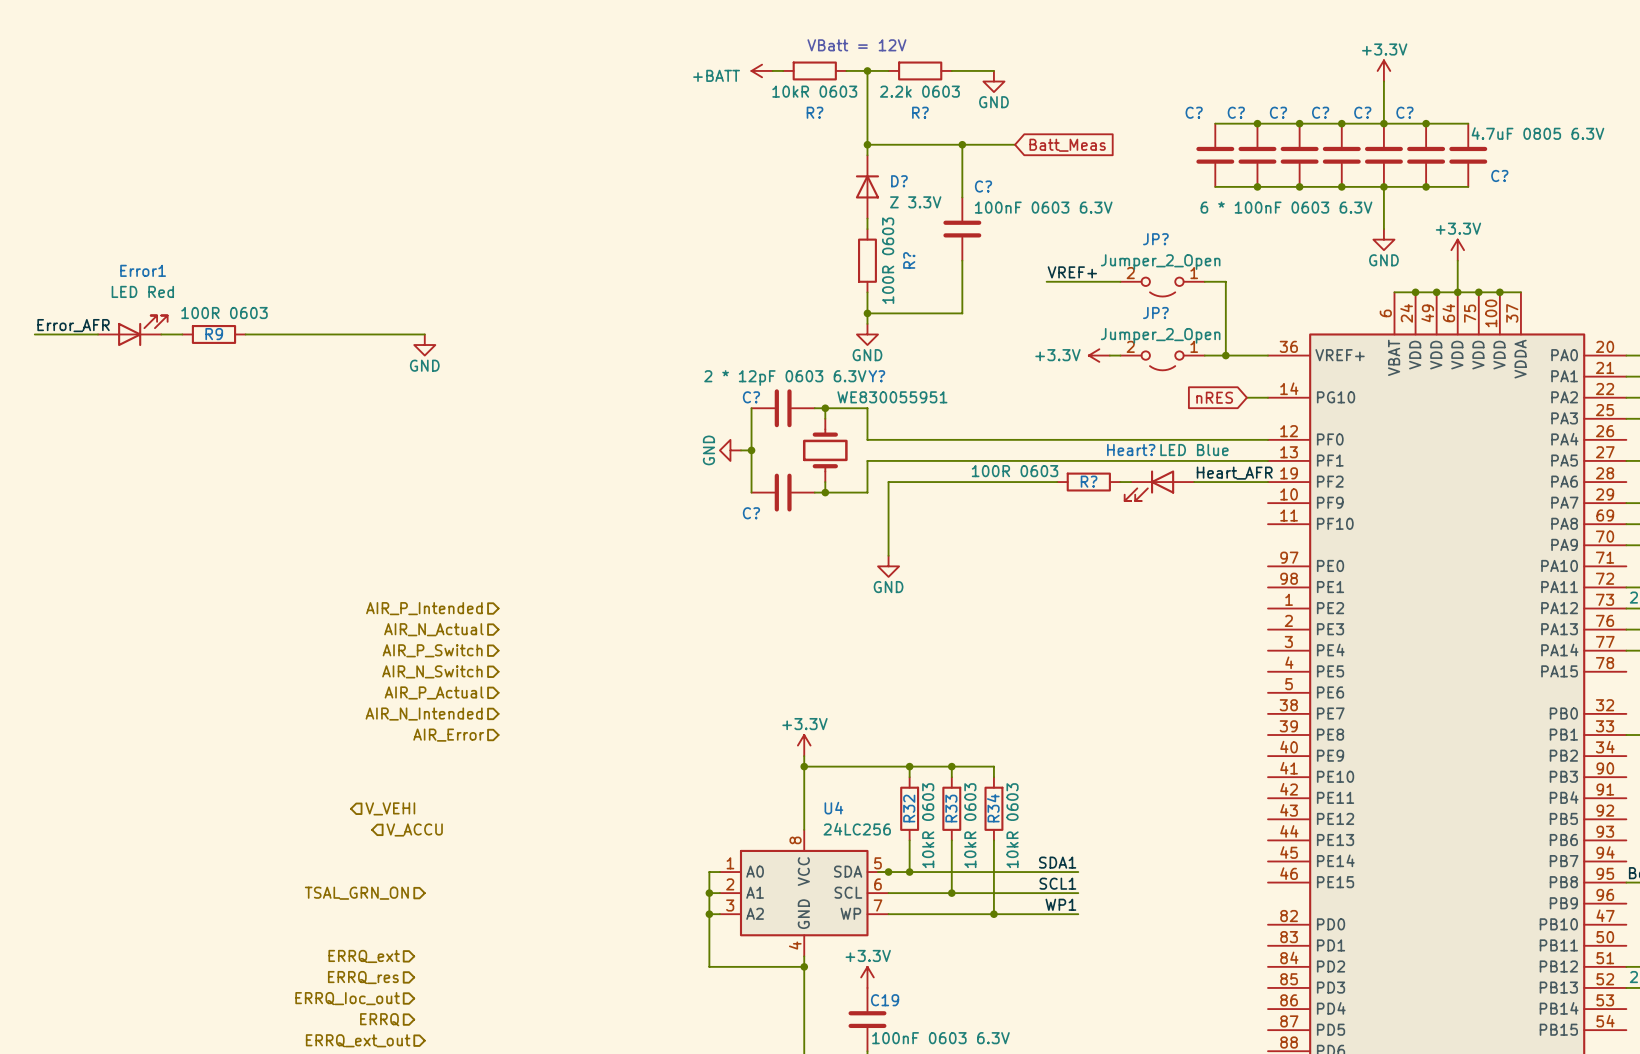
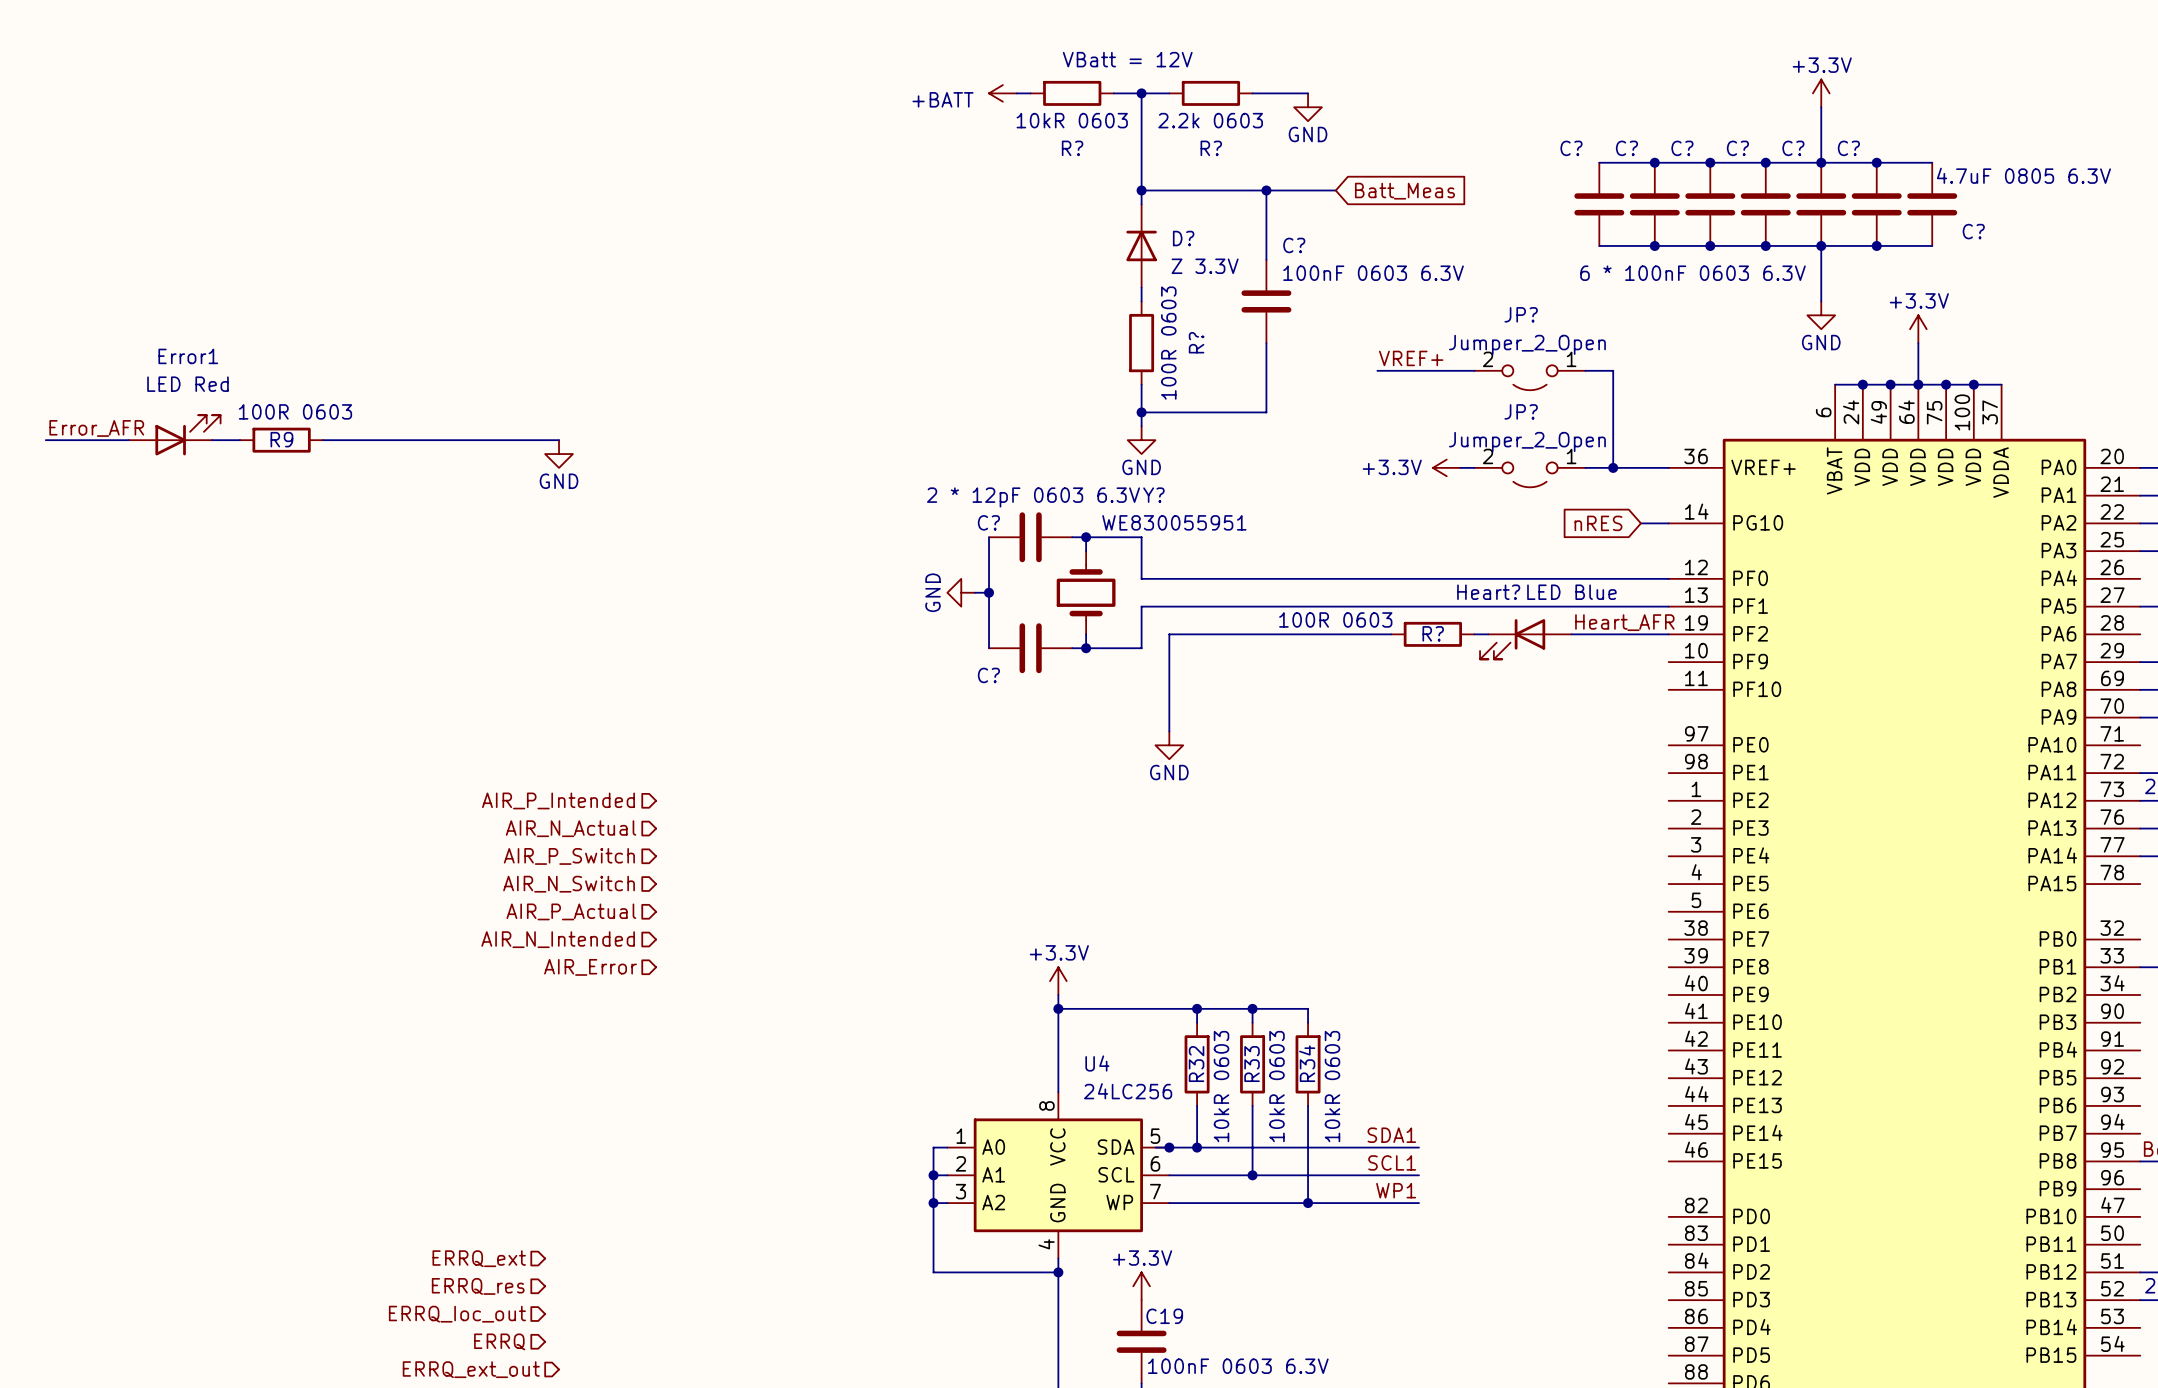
hierarchical label: V_VEHI (390, 808) -> none
hierarchical label: V_ACCU (414, 829) -> none
hierarchical label: TSAL_GRN_ON (356, 893) -> none

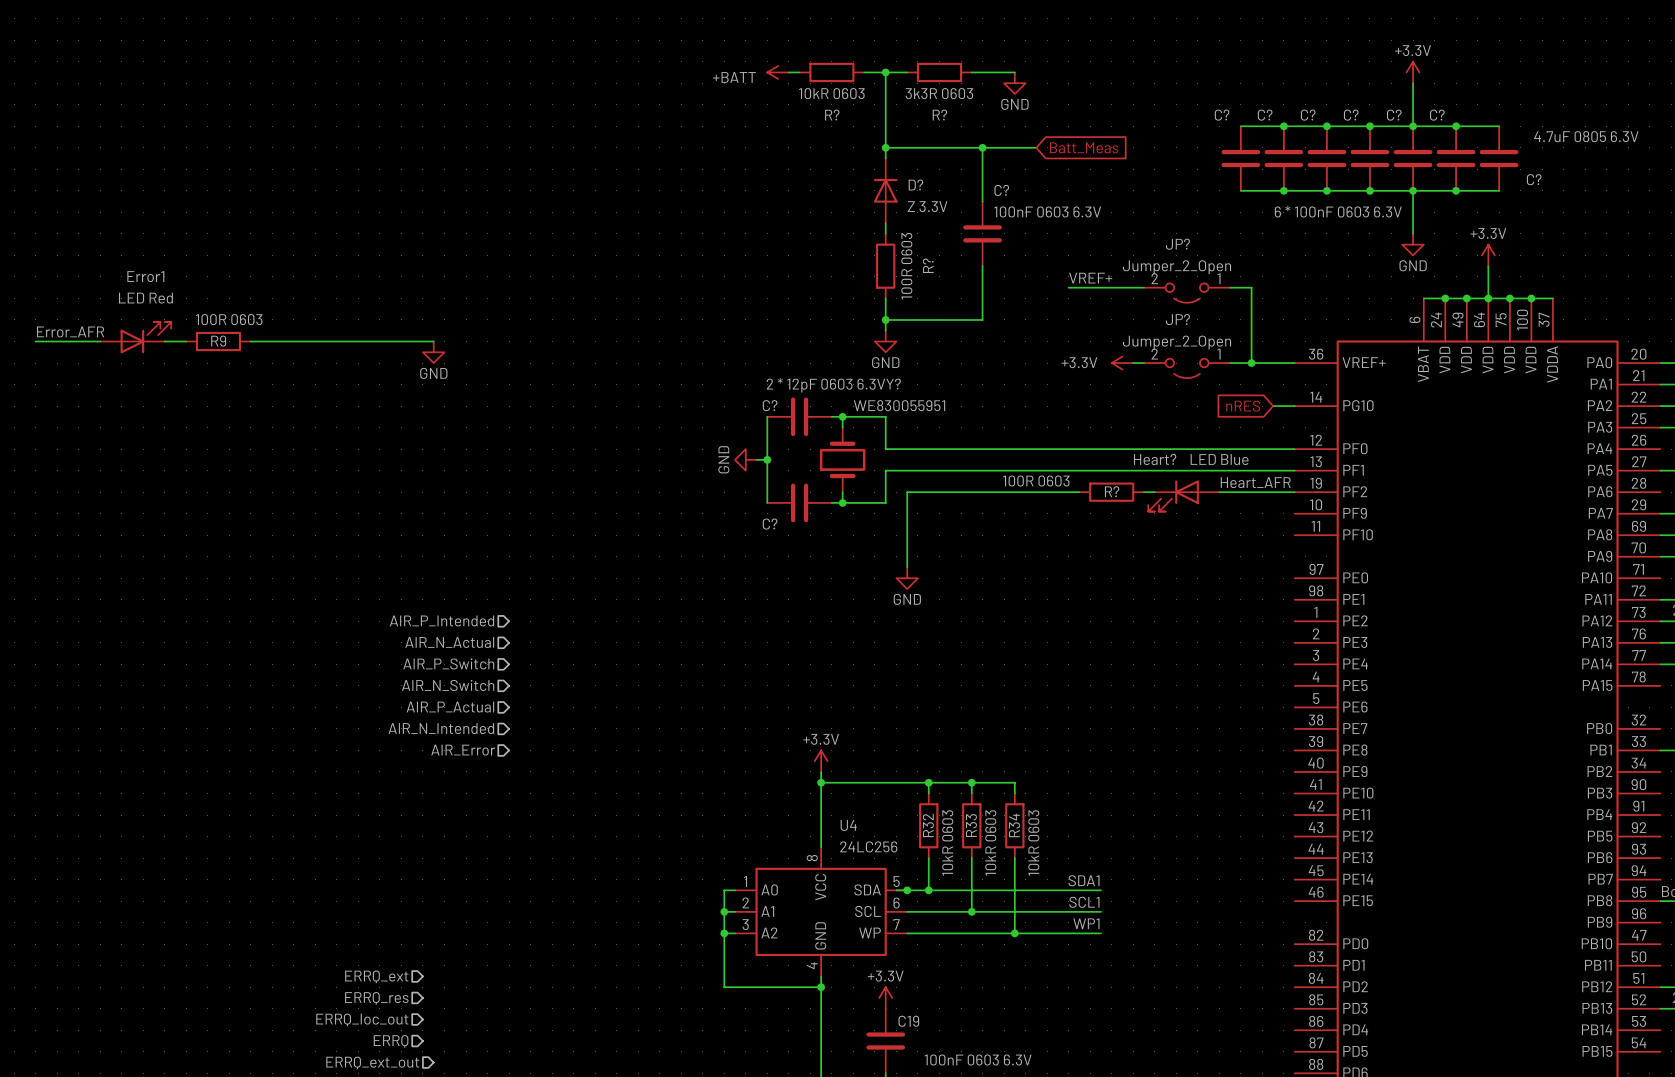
text: VBatt = 12V (1127, 59) -> none
R? value: 2.2k 0603 (1210, 120) -> 3k3R 0603 (939, 93)

